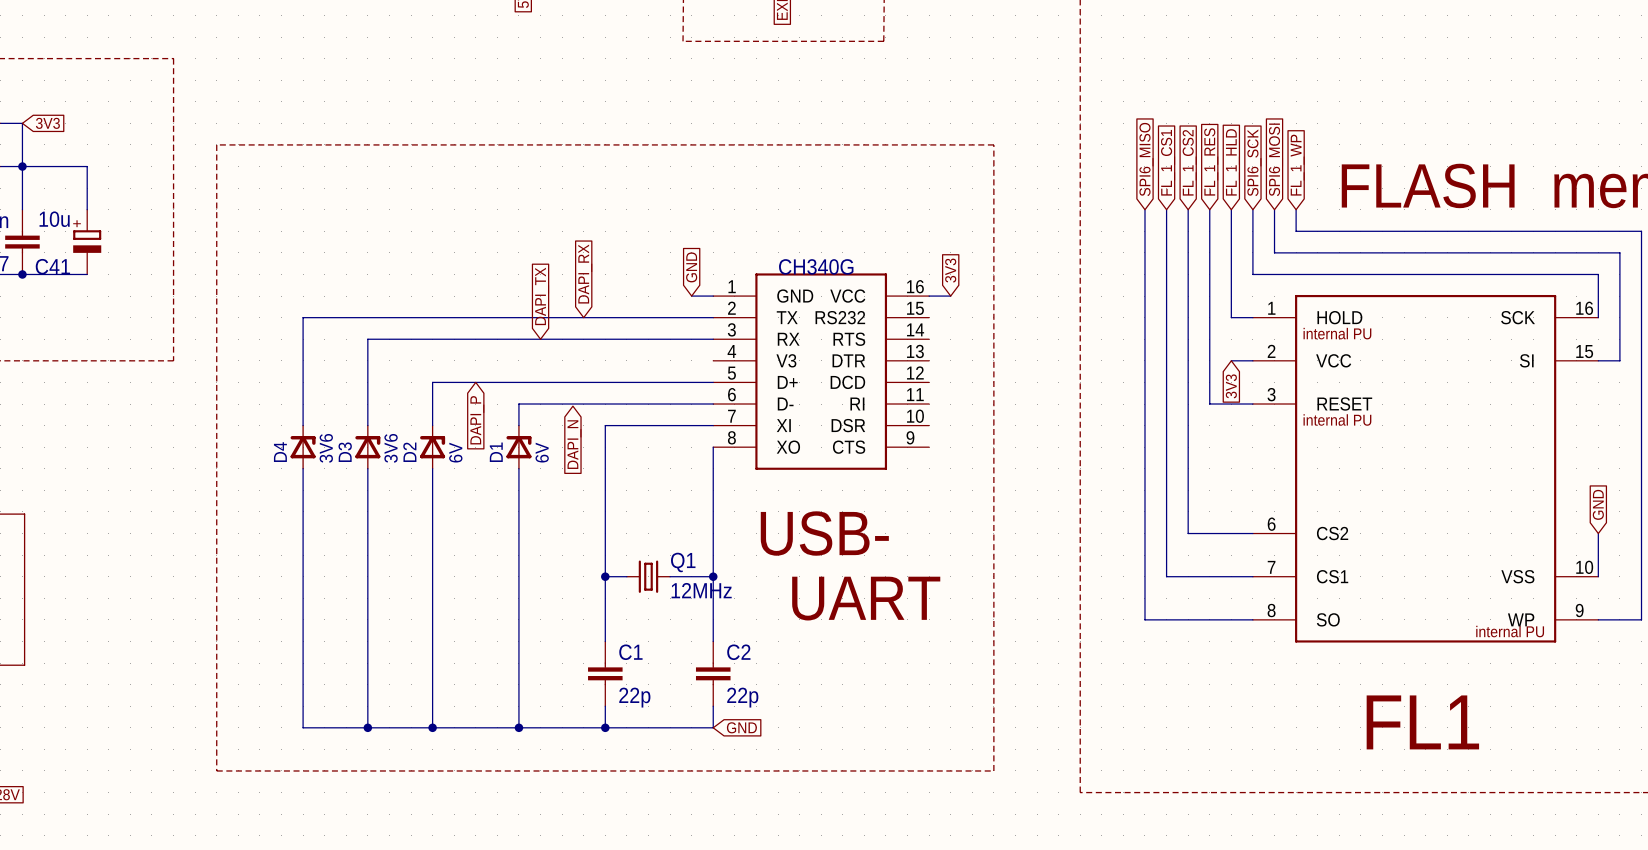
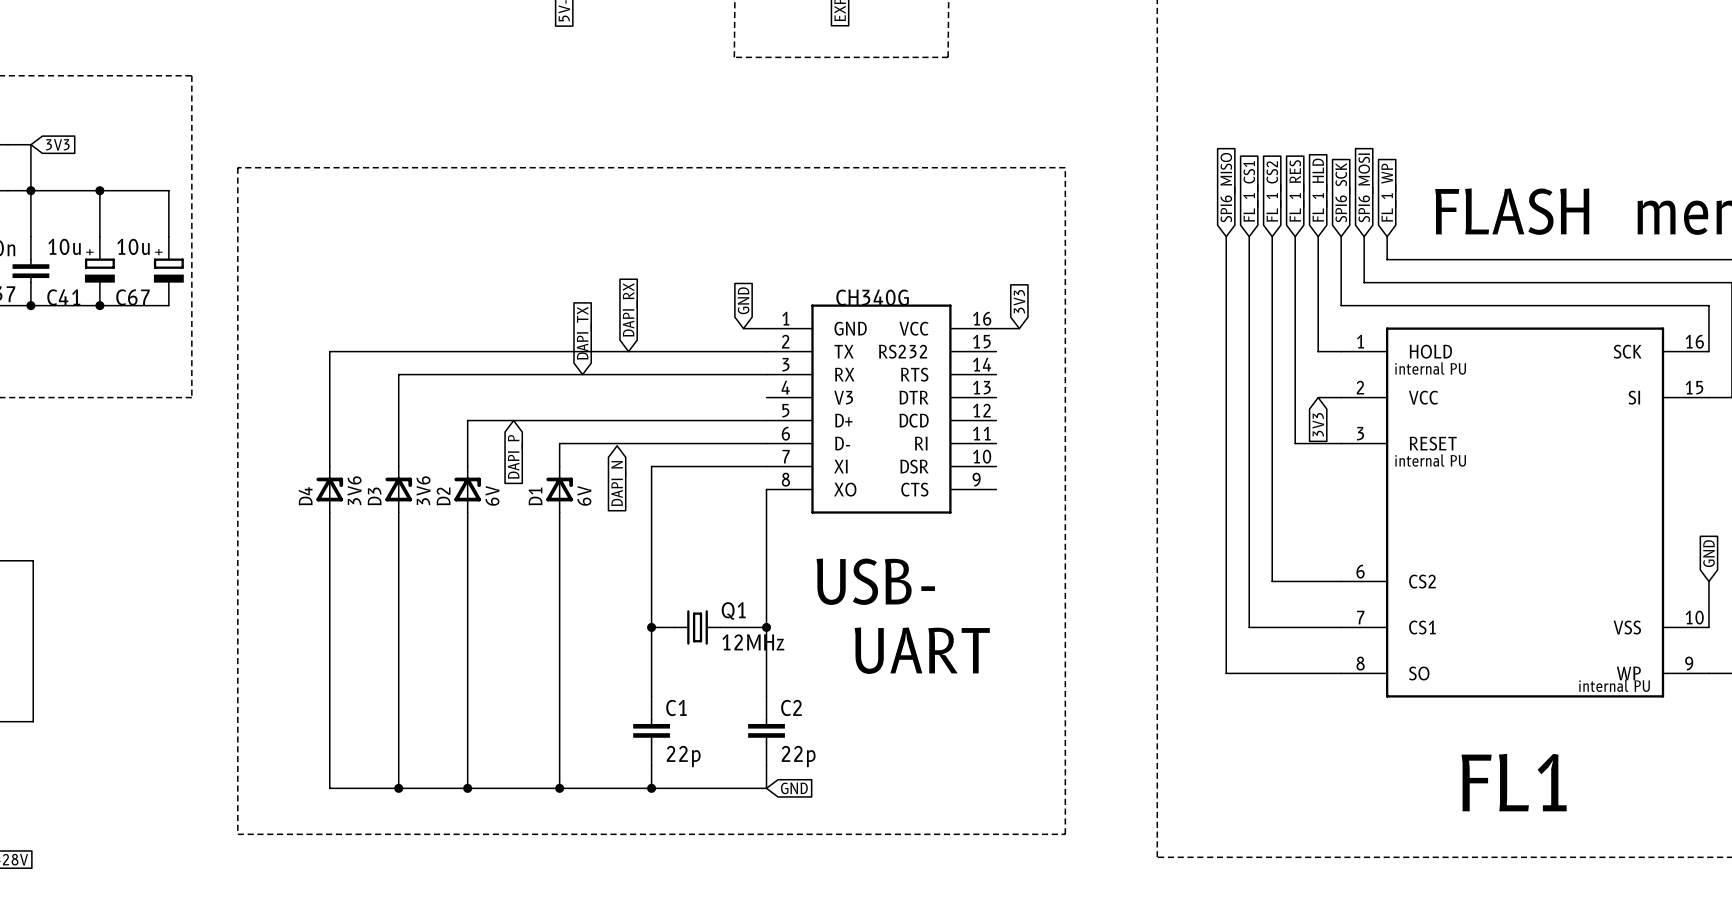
wire: none -> (99, 190) (168, 190) (168, 236)
junction: none -> (99, 190)
C67: none -> 10u (168, 271)
wire: none -> (99, 305) (168, 305)
junction: none -> (99, 305)

